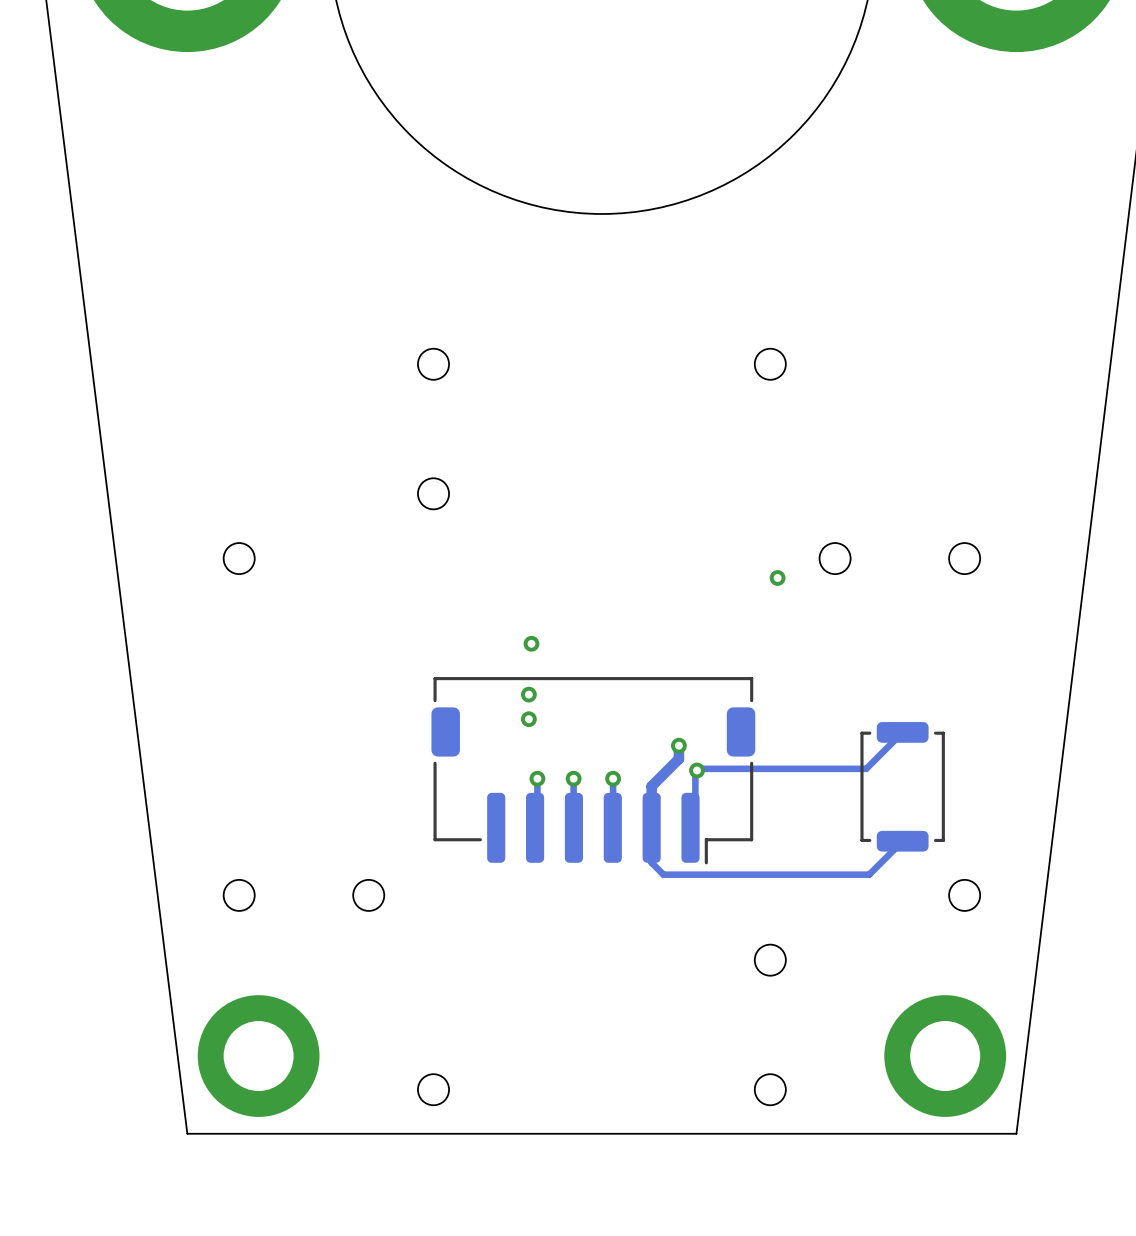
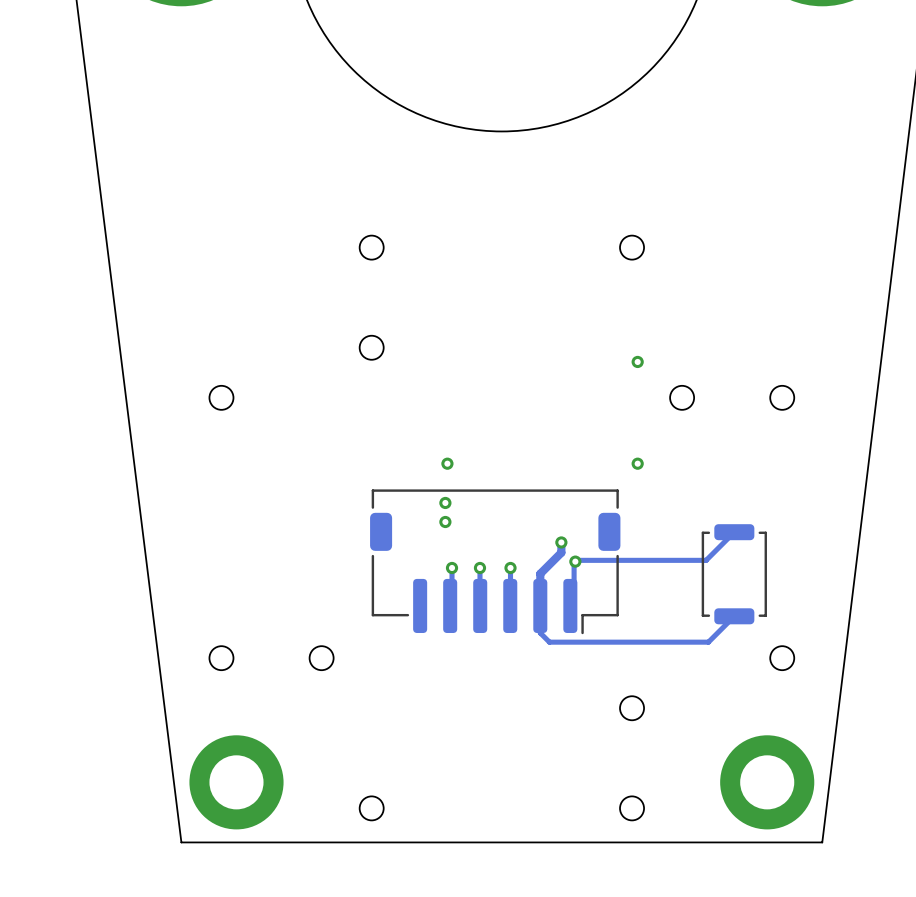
via: none -> (637, 361)
via: (777, 577) -> none
via: none -> (637, 463)

